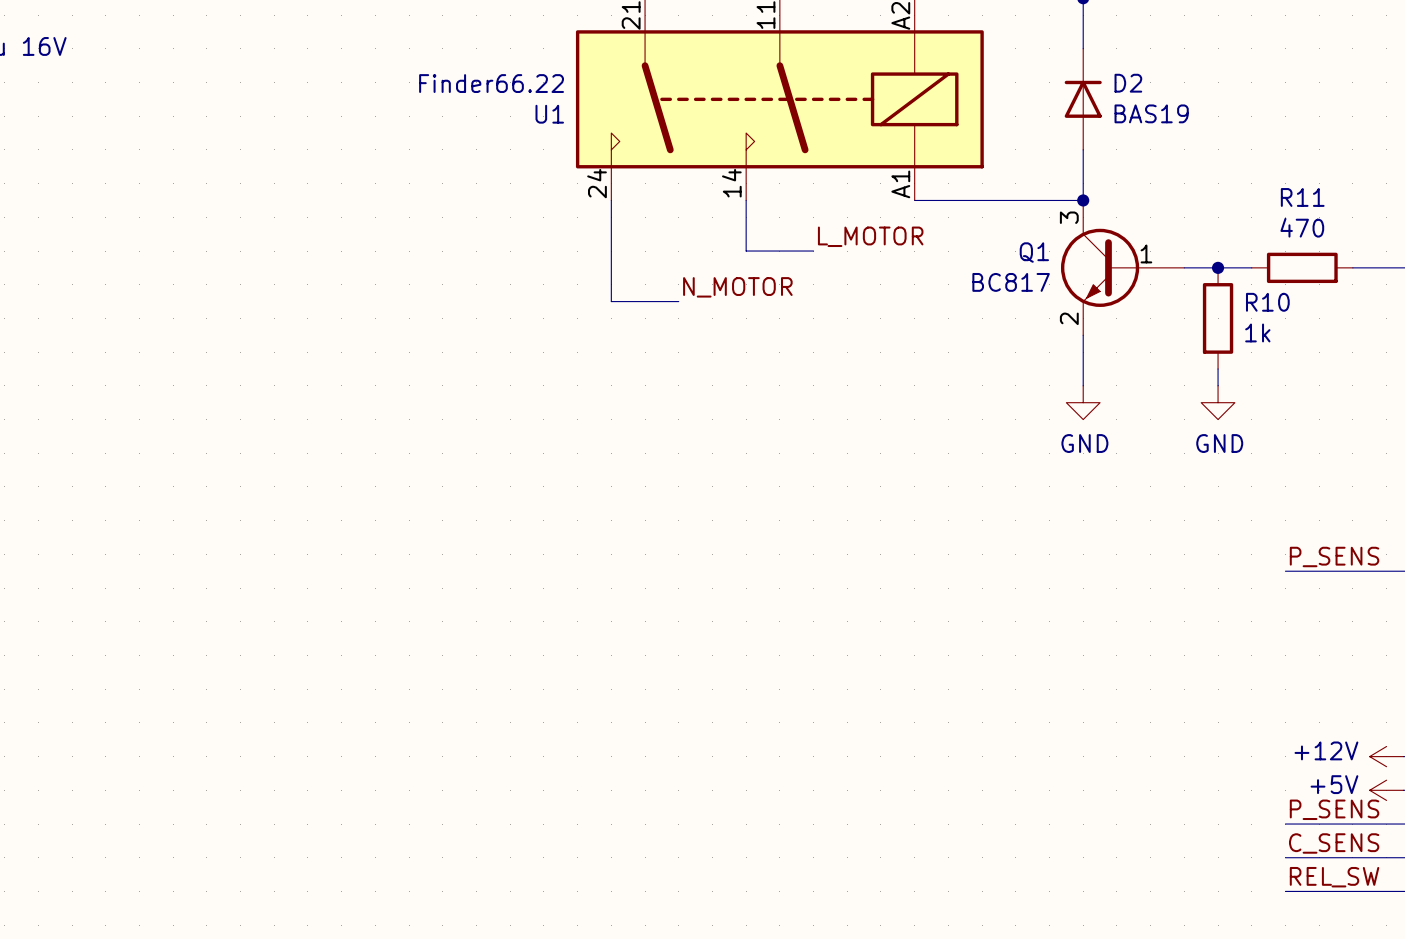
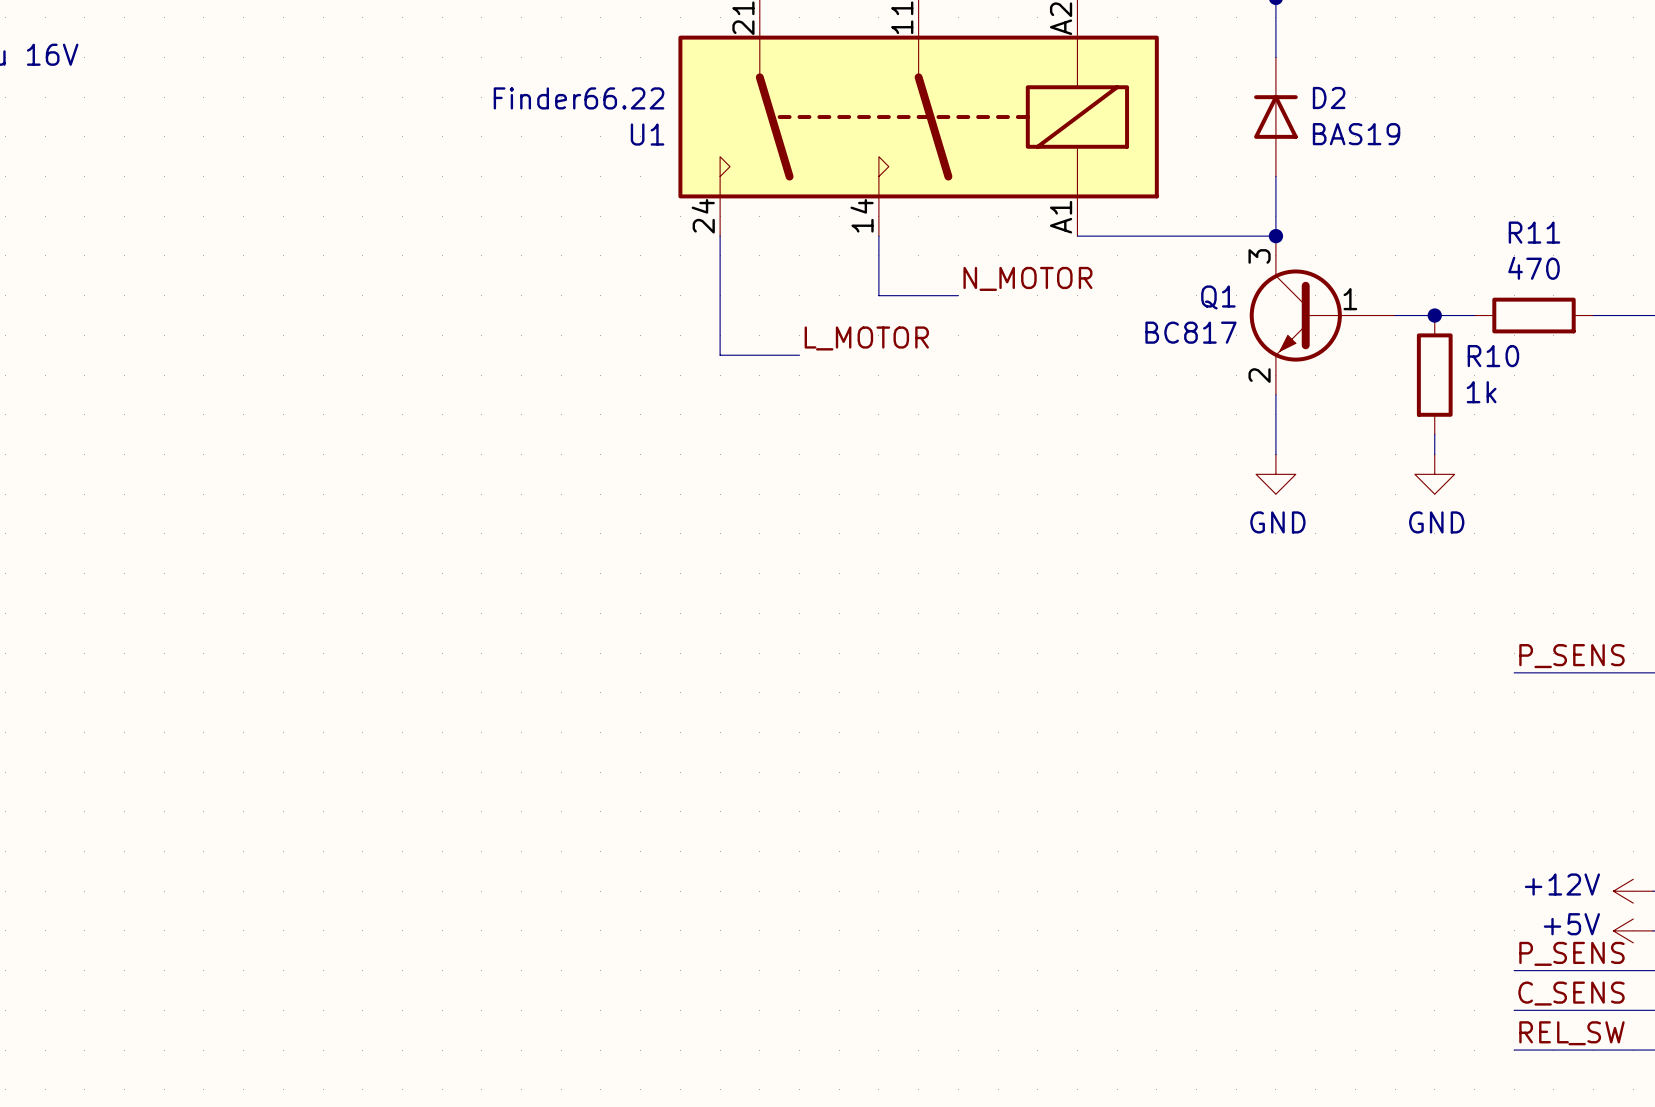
label: L_MOTOR (870, 236) -> N_MOTOR (1027, 278)
label: N_MOTOR (737, 287) -> L_MOTOR (866, 338)

